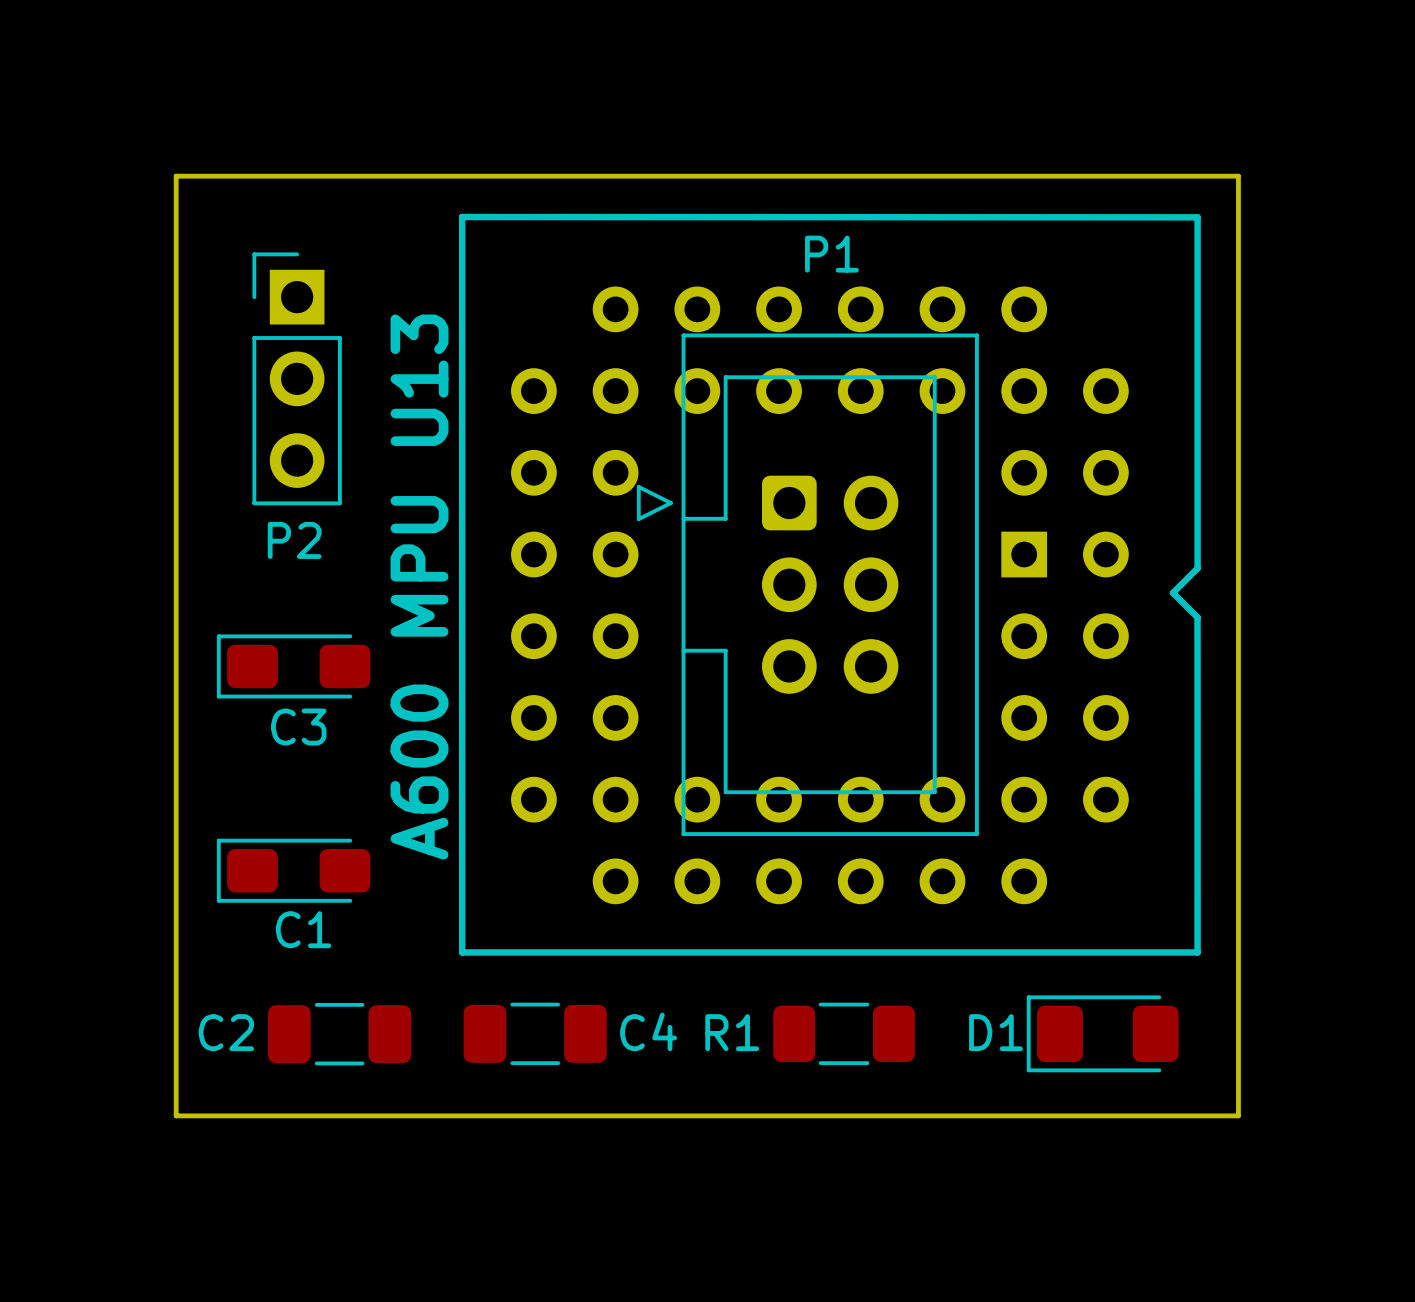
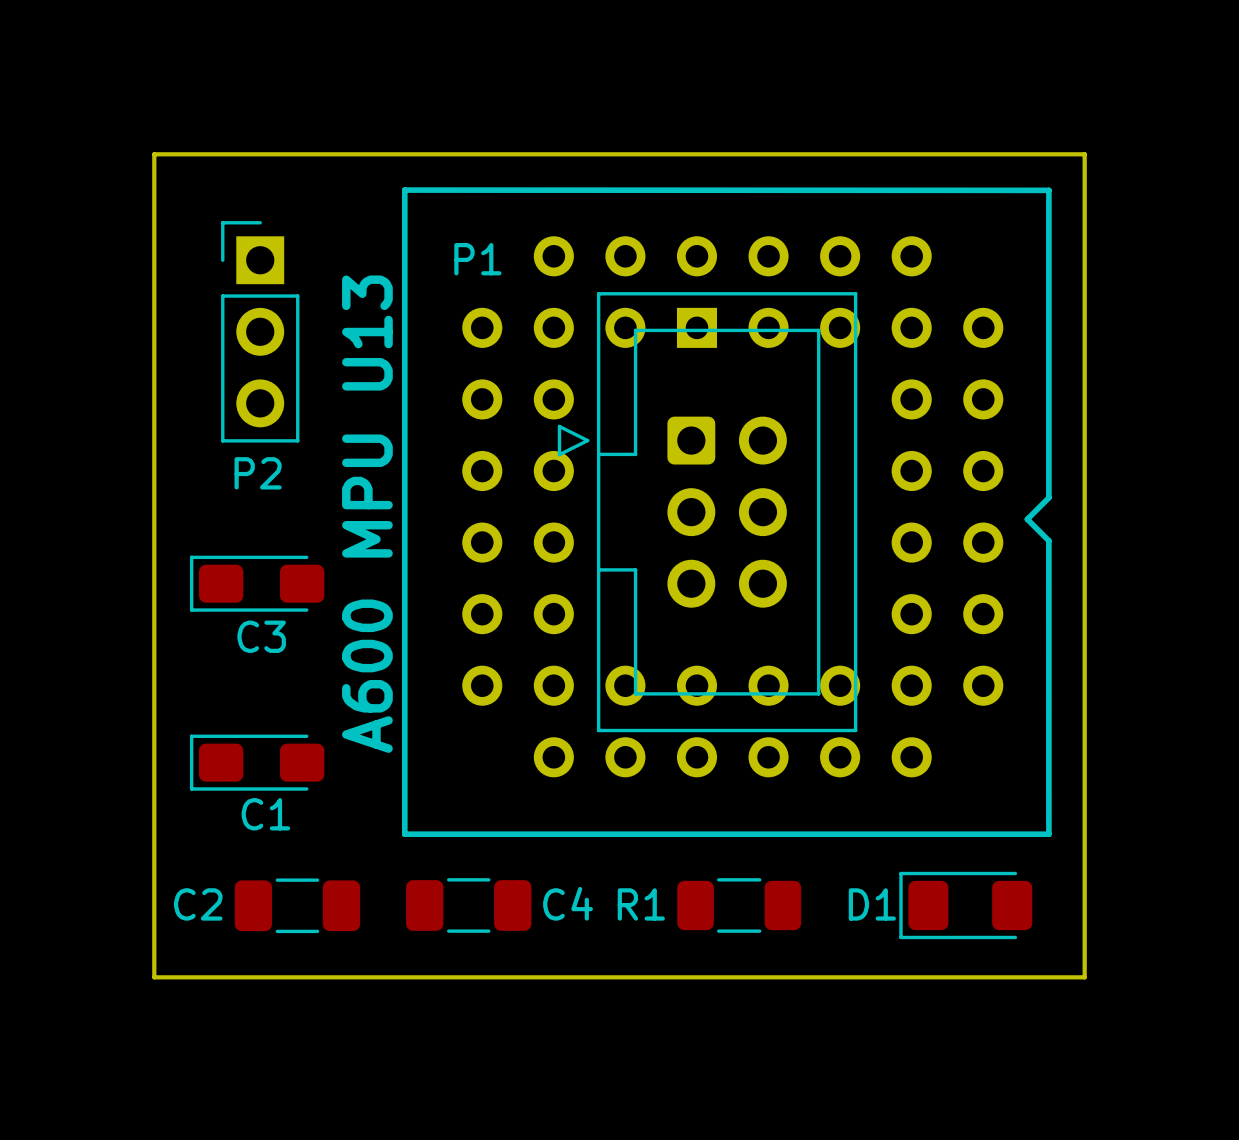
P1 name position: P1 (831, 254) -> P1 (477, 259)
part rotation: 0° (819, 595) -> 90° counterclockwise (732, 506)

